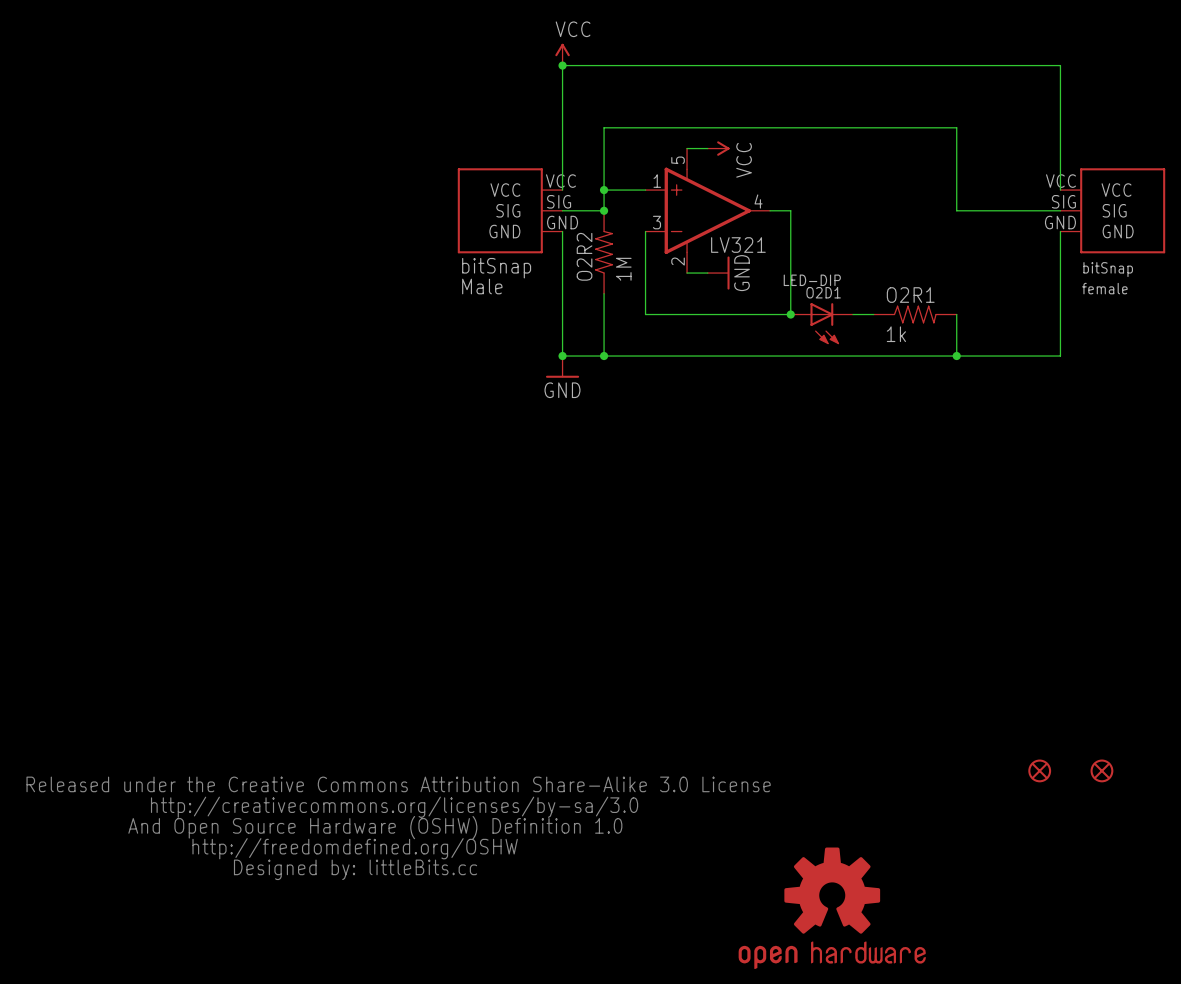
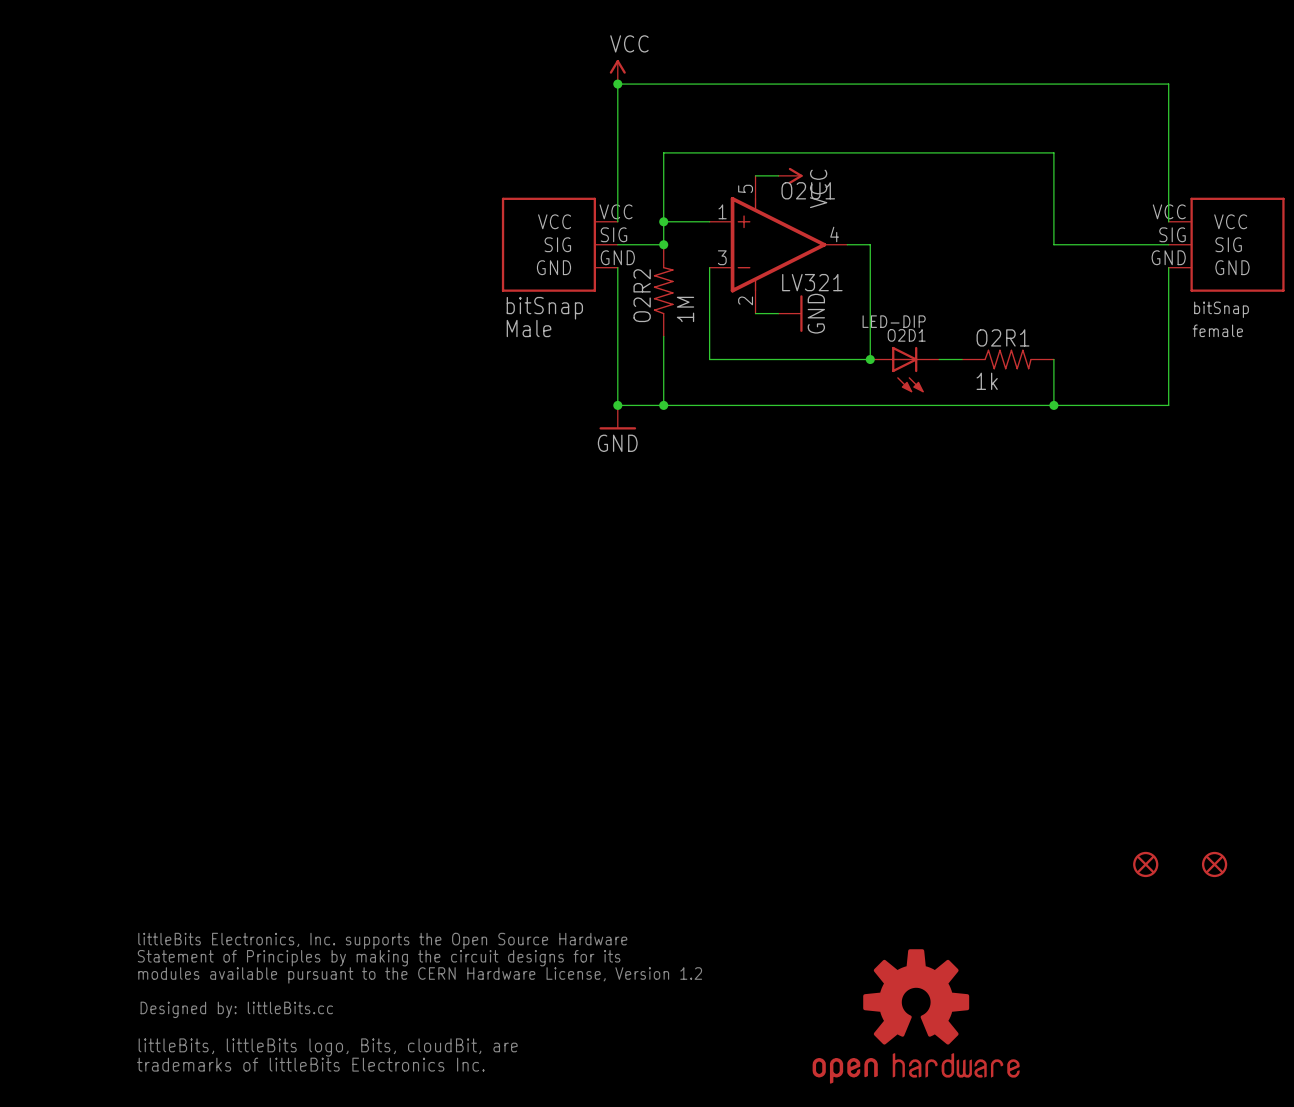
O2U1 name: none -> O2U1 (808, 190)
part: (398, 828) -> none
part: none -> (419, 1002)

